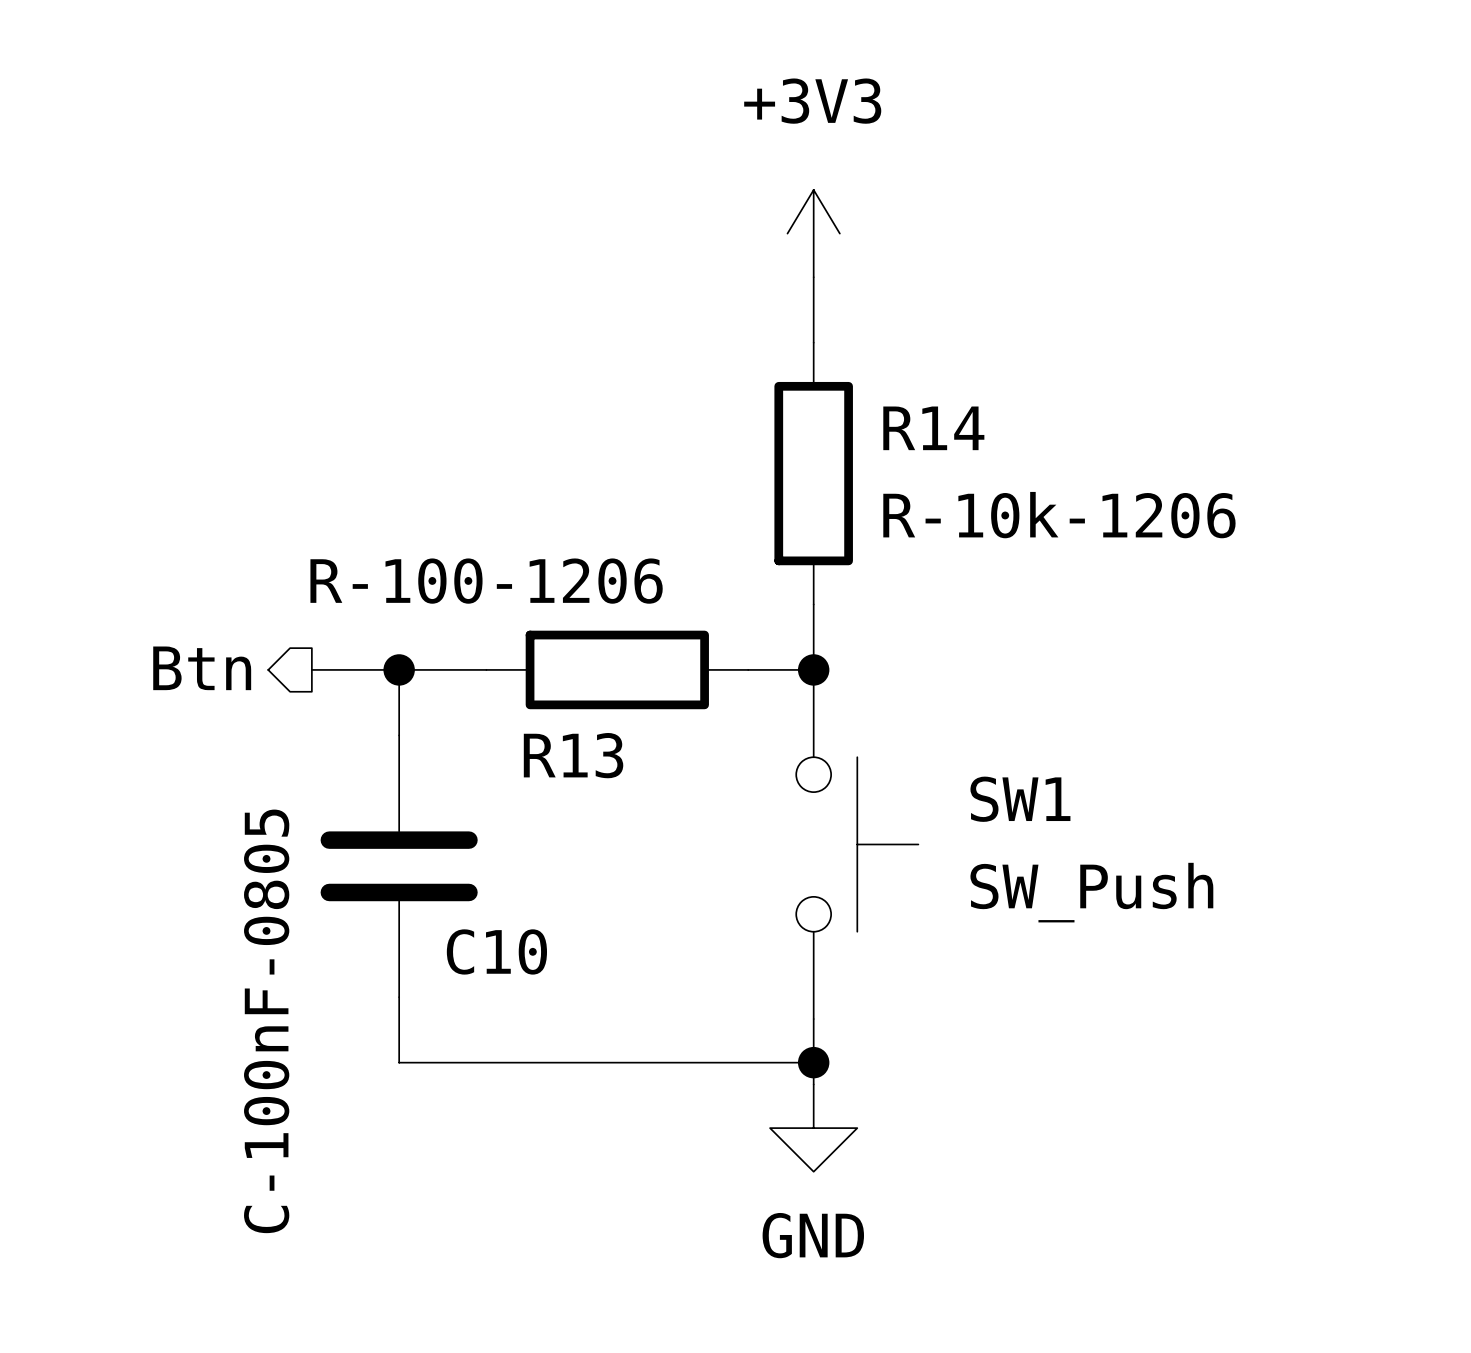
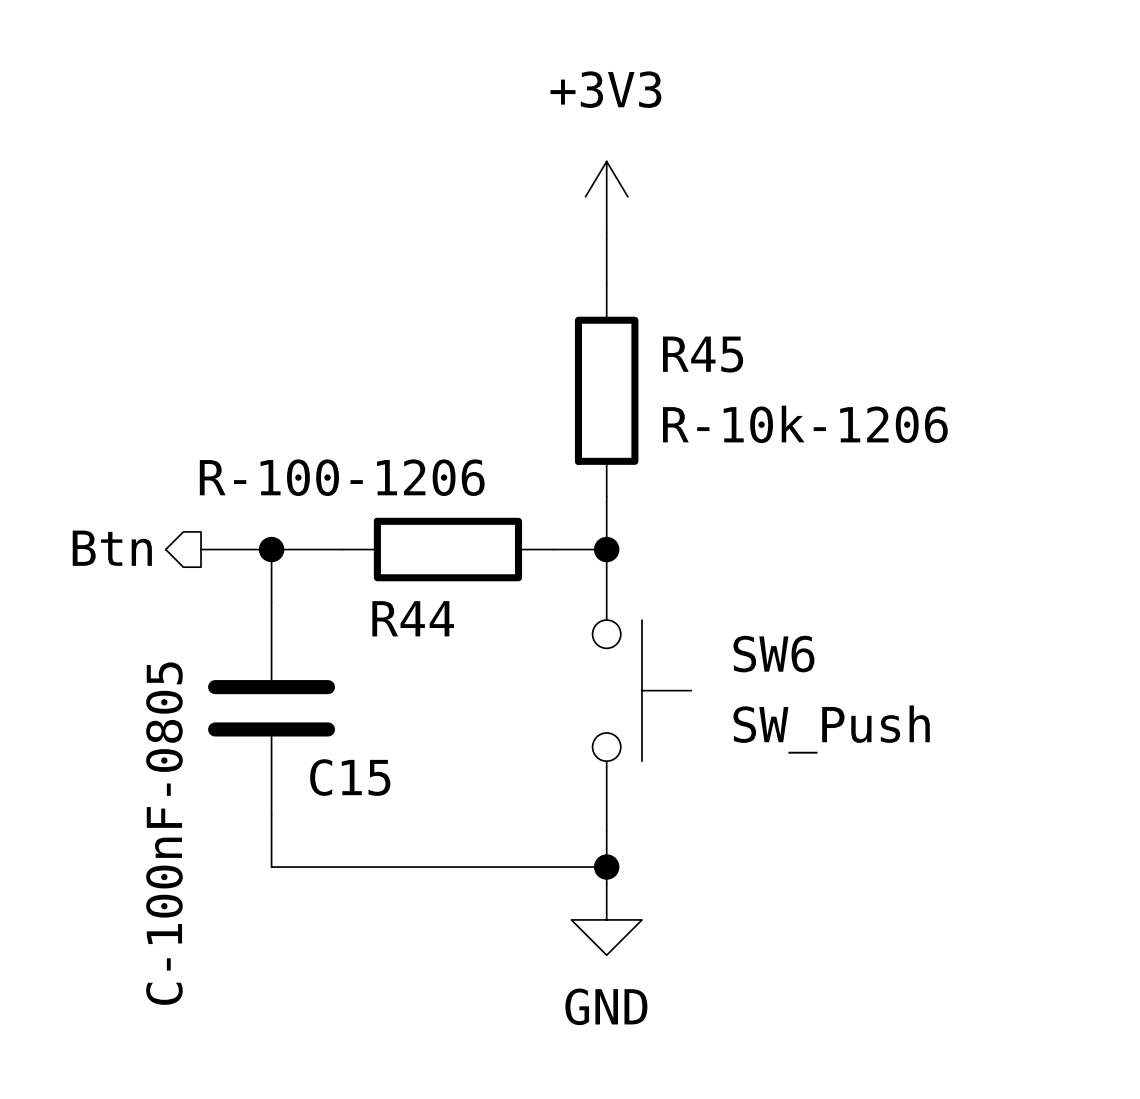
R14 name: R14 (933, 428) -> R45 (703, 354)
R13 name: R13 (573, 755) -> R44 (413, 618)
SW1 name: SW1 (1020, 799) -> SW6 (773, 654)
C10 name: C10 (496, 951) -> C15 (350, 777)

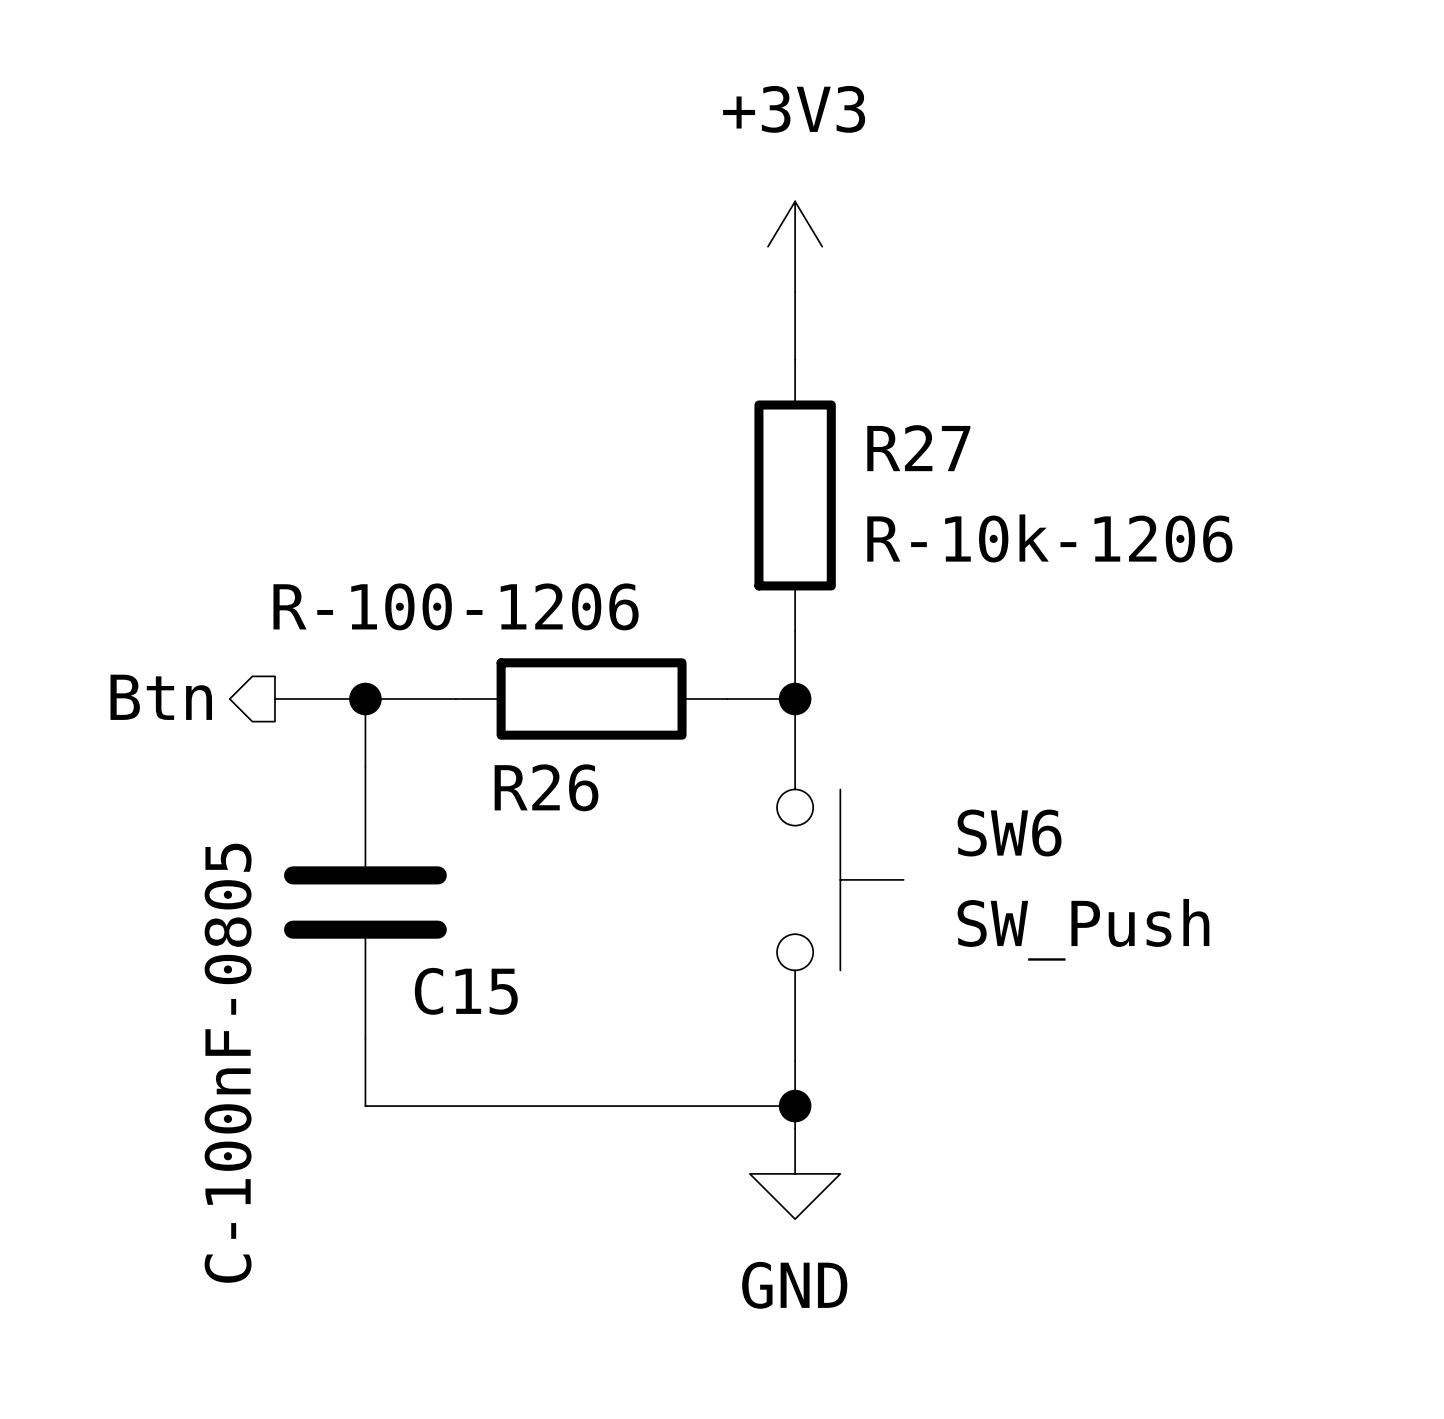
R45 name: R45 (703, 354) -> R27 (918, 448)
R44 name: R44 (413, 618) -> R26 (546, 787)

